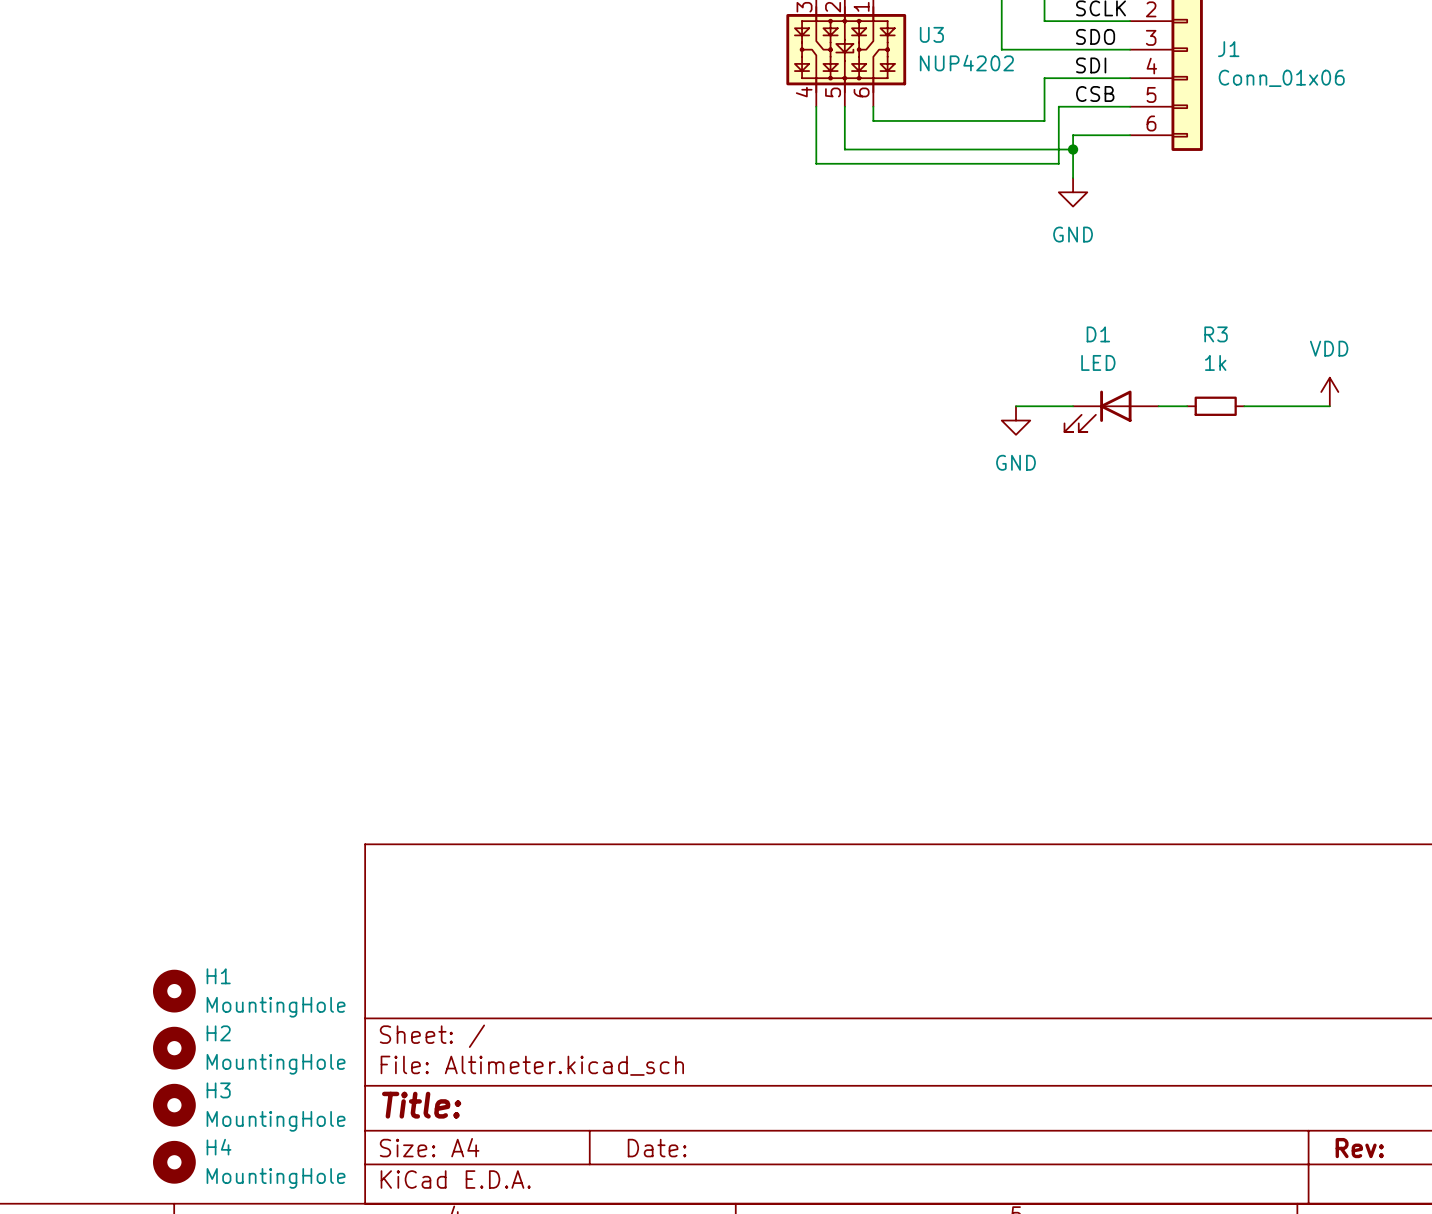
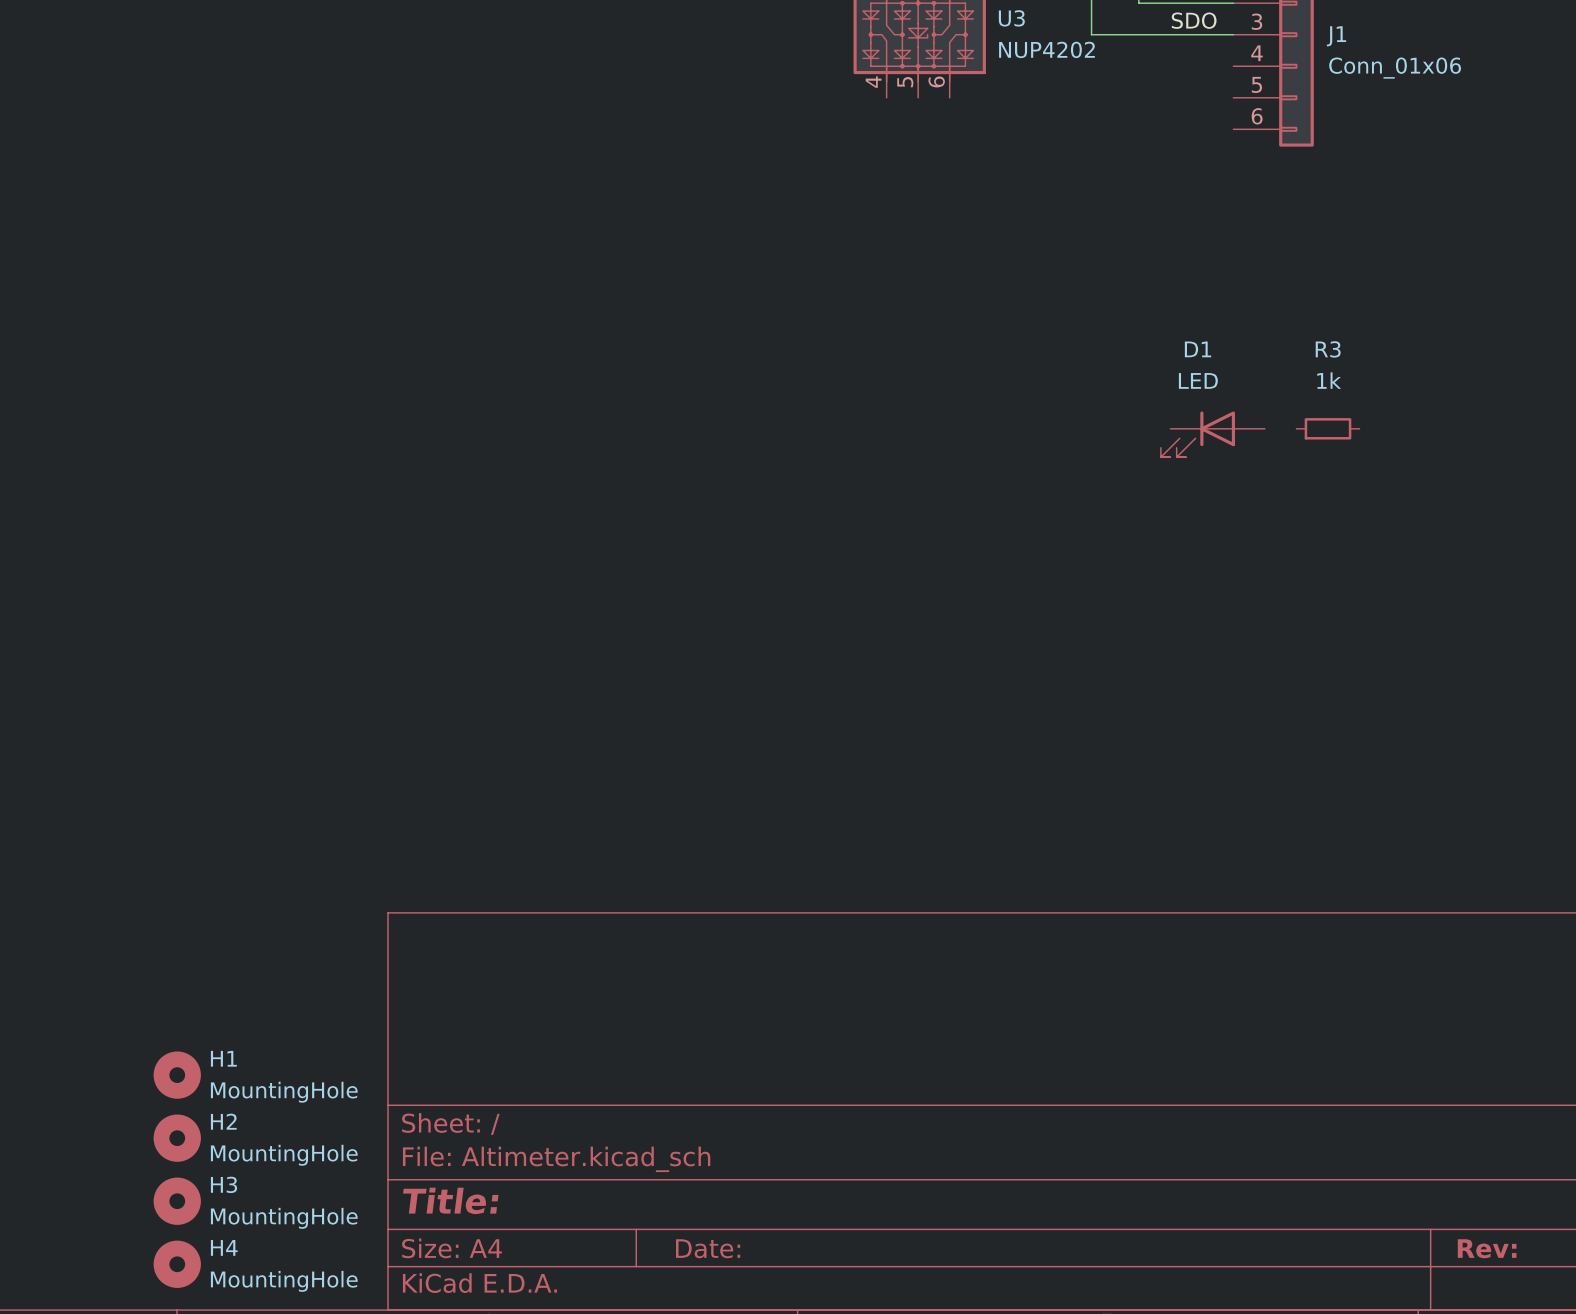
label: SDI (1091, 65) -> none
wire: (1130, 78) (1044, 78) (1044, 120) (873, 120) (873, 106) -> none
label: CSB (1095, 93) -> none
wire: (816, 106) (816, 163) (1058, 163) (1058, 106) (1130, 106) -> none
wire: (844, 106) (844, 149) (1073, 149) -> none
wire: (1130, 135) (1073, 135) (1073, 178) -> none
junction: (1073, 149) -> none
power symbol: GND (1073, 192) -> none
power symbol: VDD (1329, 392) -> none
wire: (1016, 406) (1073, 406) -> none
wire: (1158, 406) (1187, 406) -> none
wire: (1244, 406) (1329, 406) -> none
power symbol: GND (1016, 420) -> none

